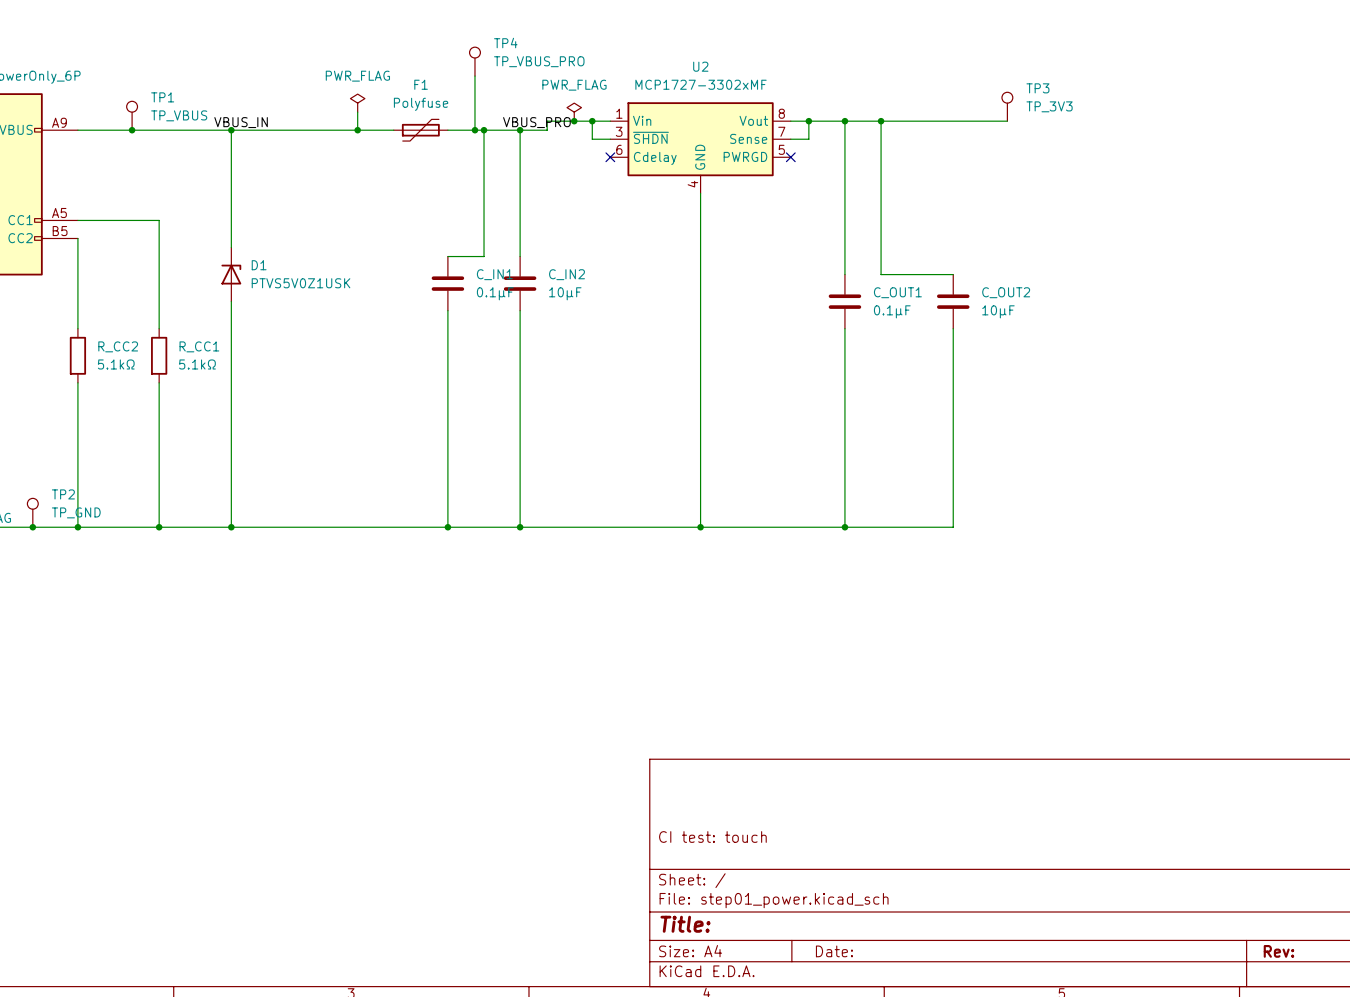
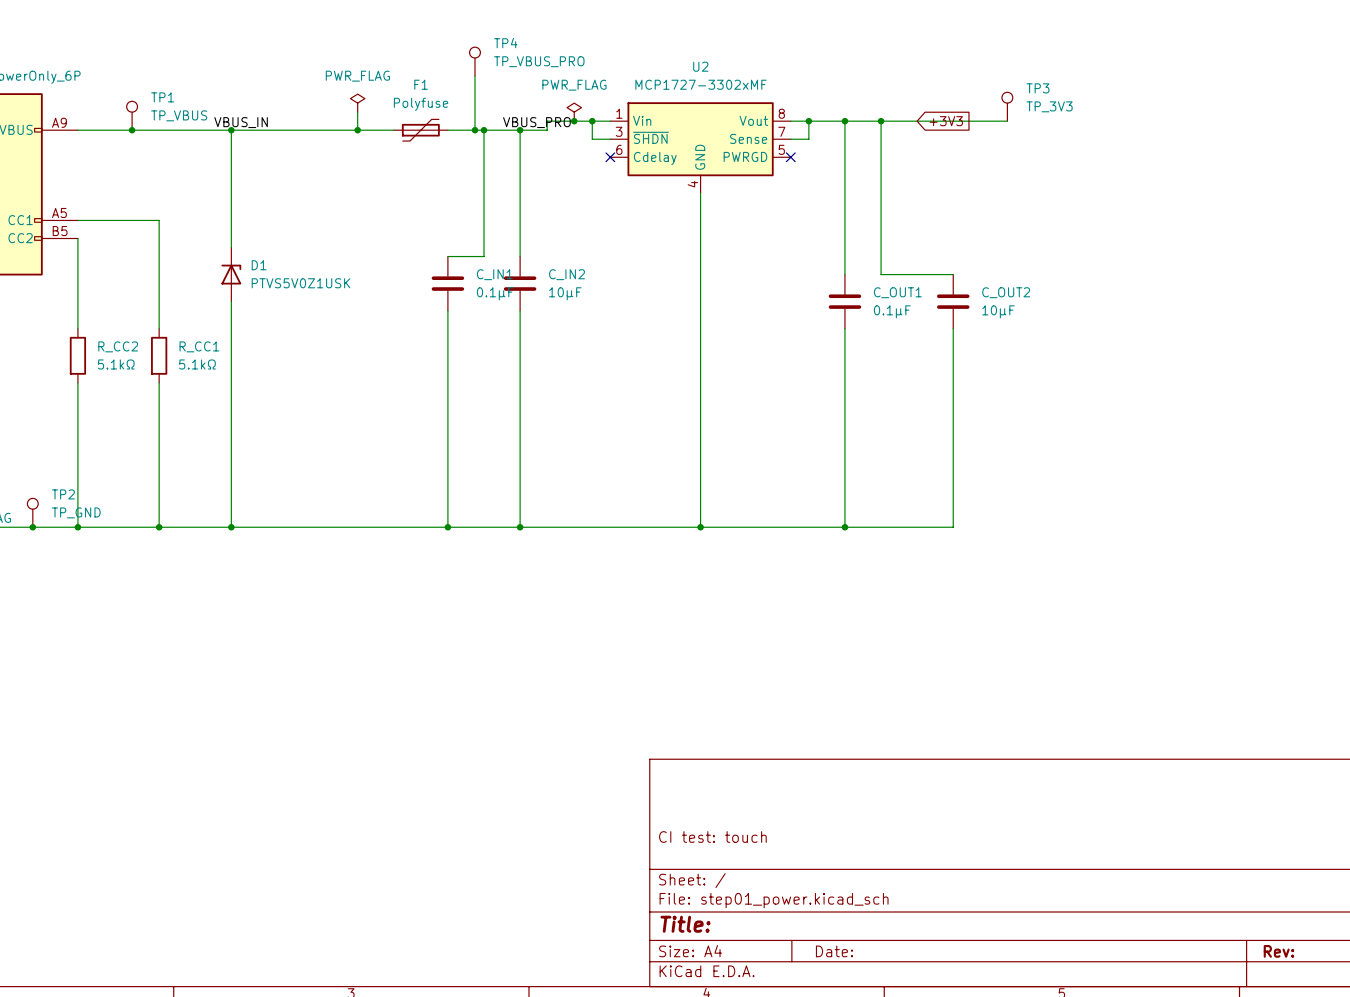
global label: none -> +3V3 (946, 121)

